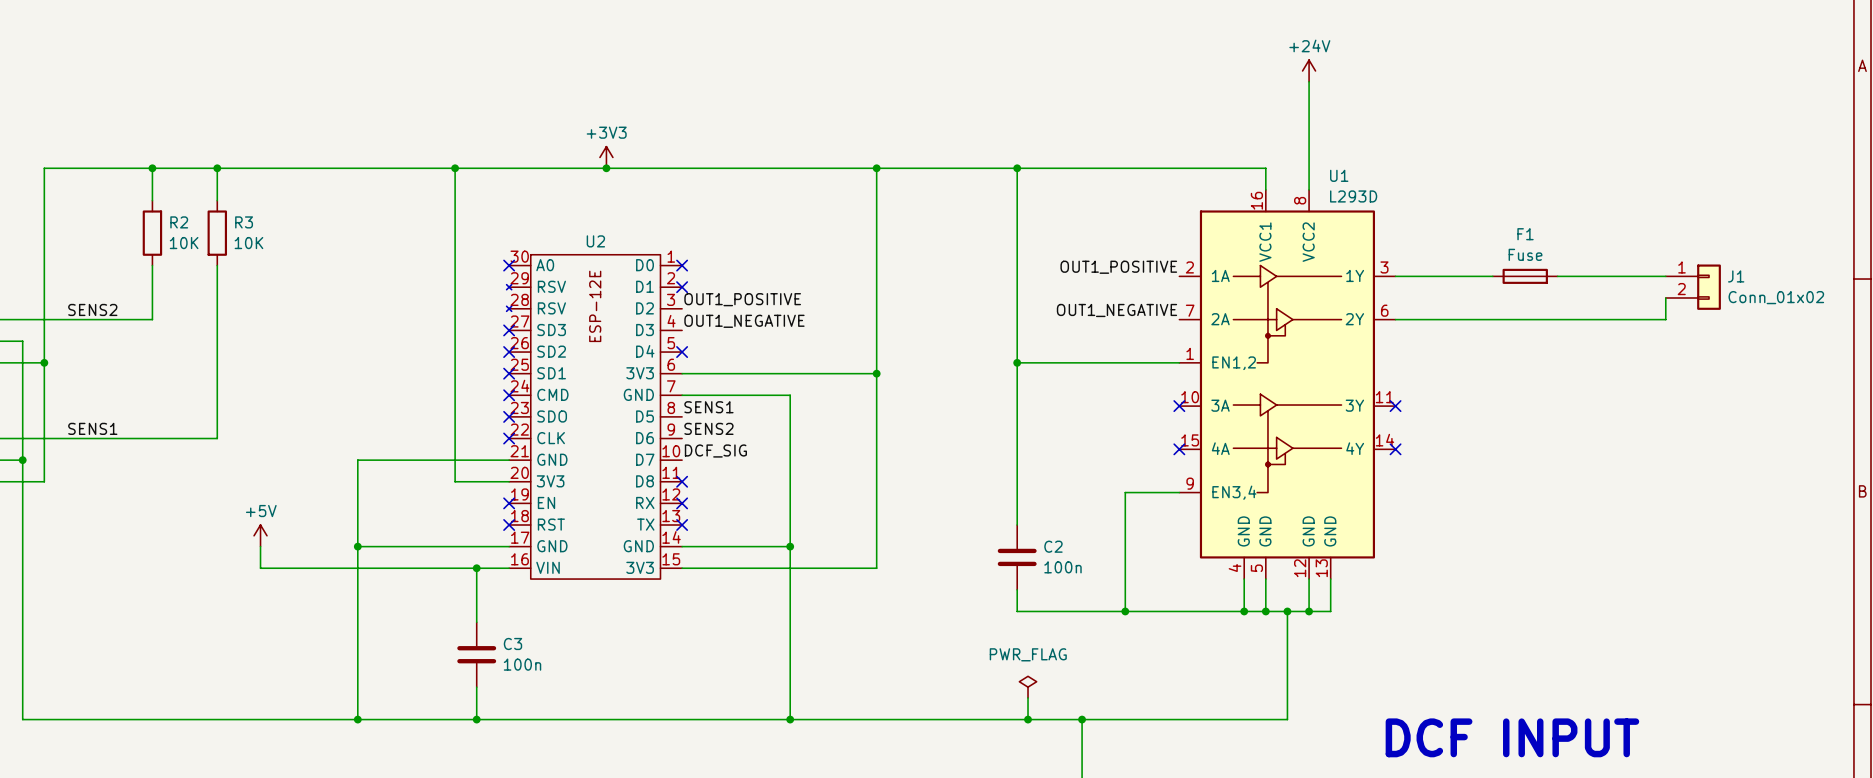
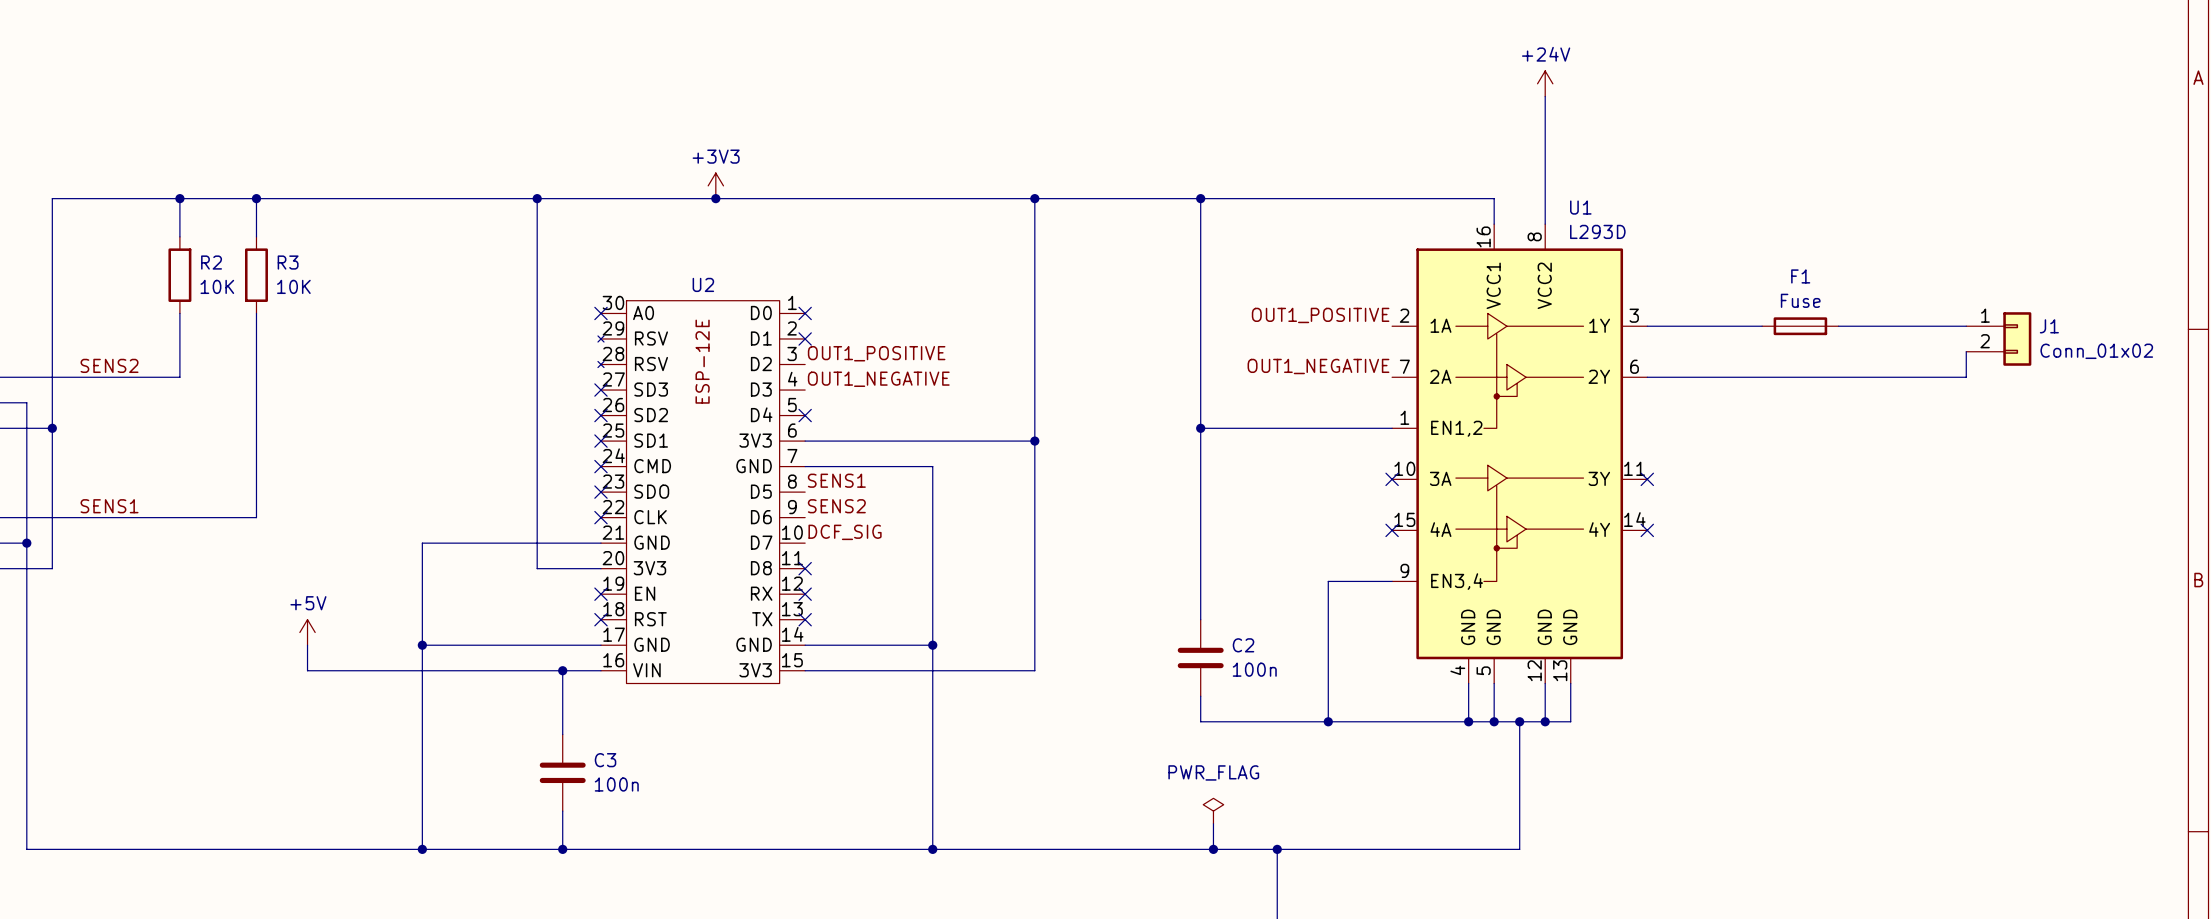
text: DCF INPUT (1512, 737) -> none

